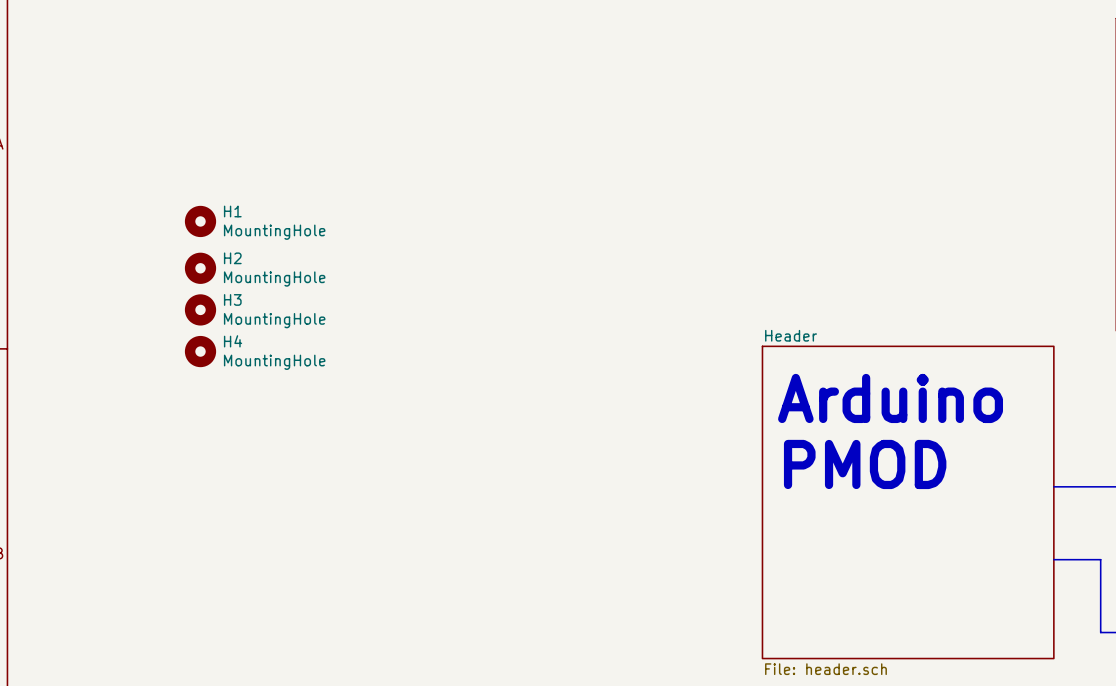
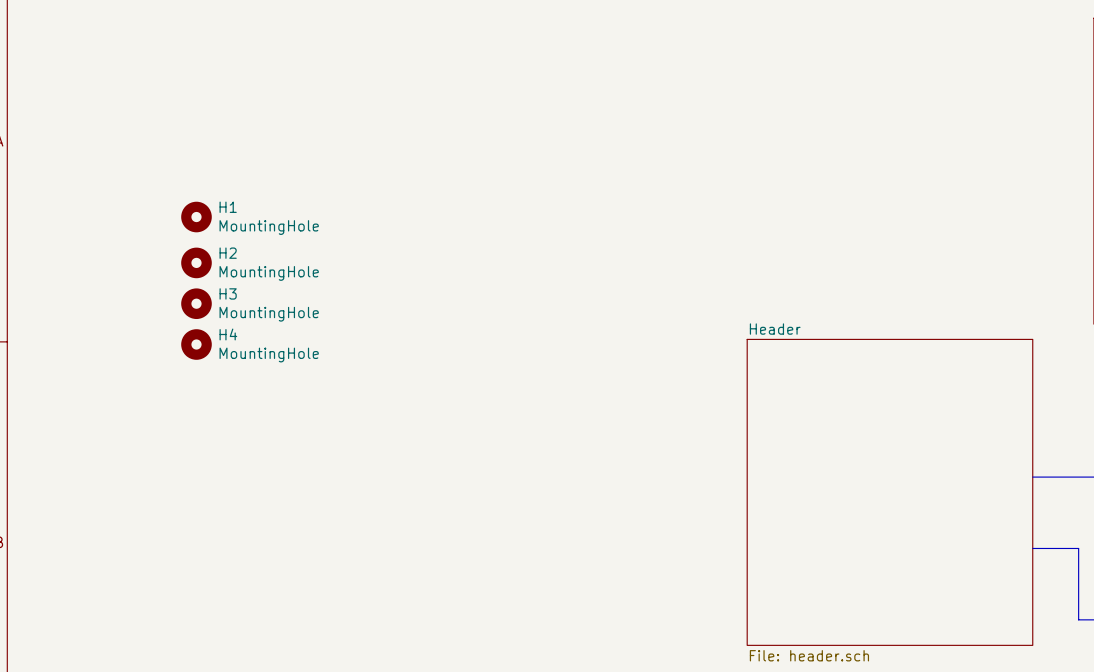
text: Arduino (890, 398) -> none
text: PMOD (865, 464) -> none

